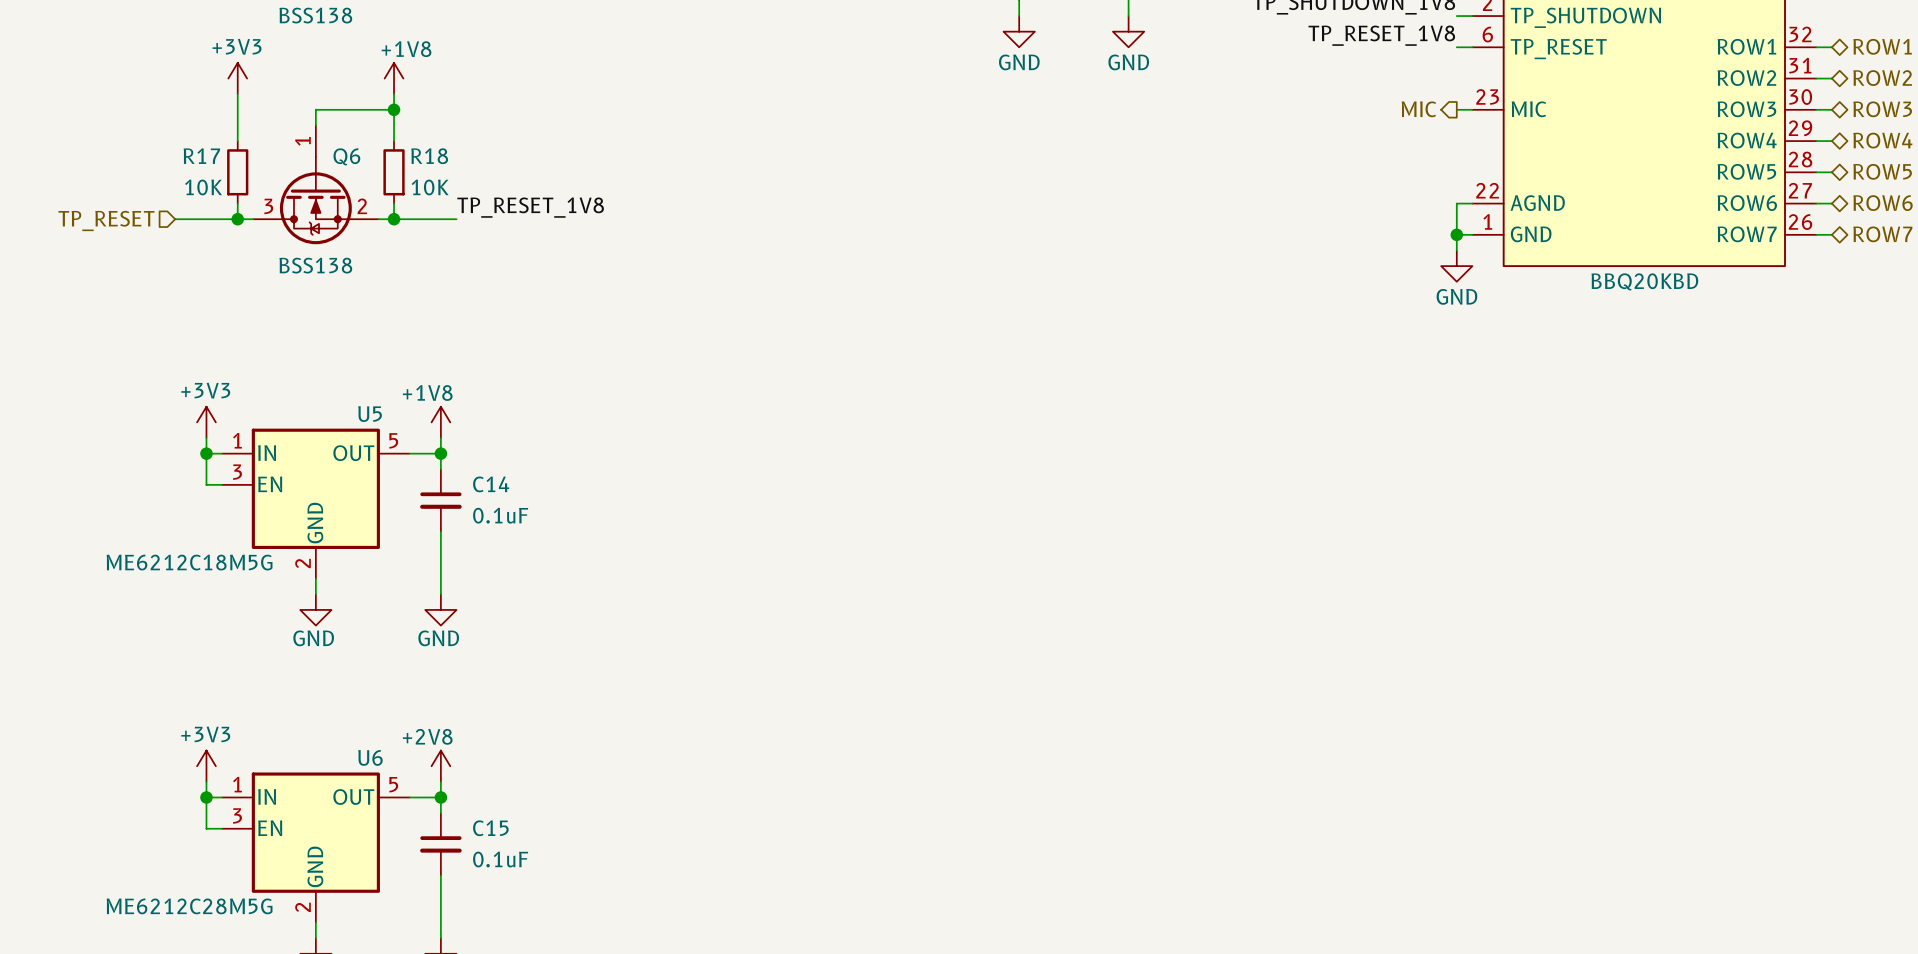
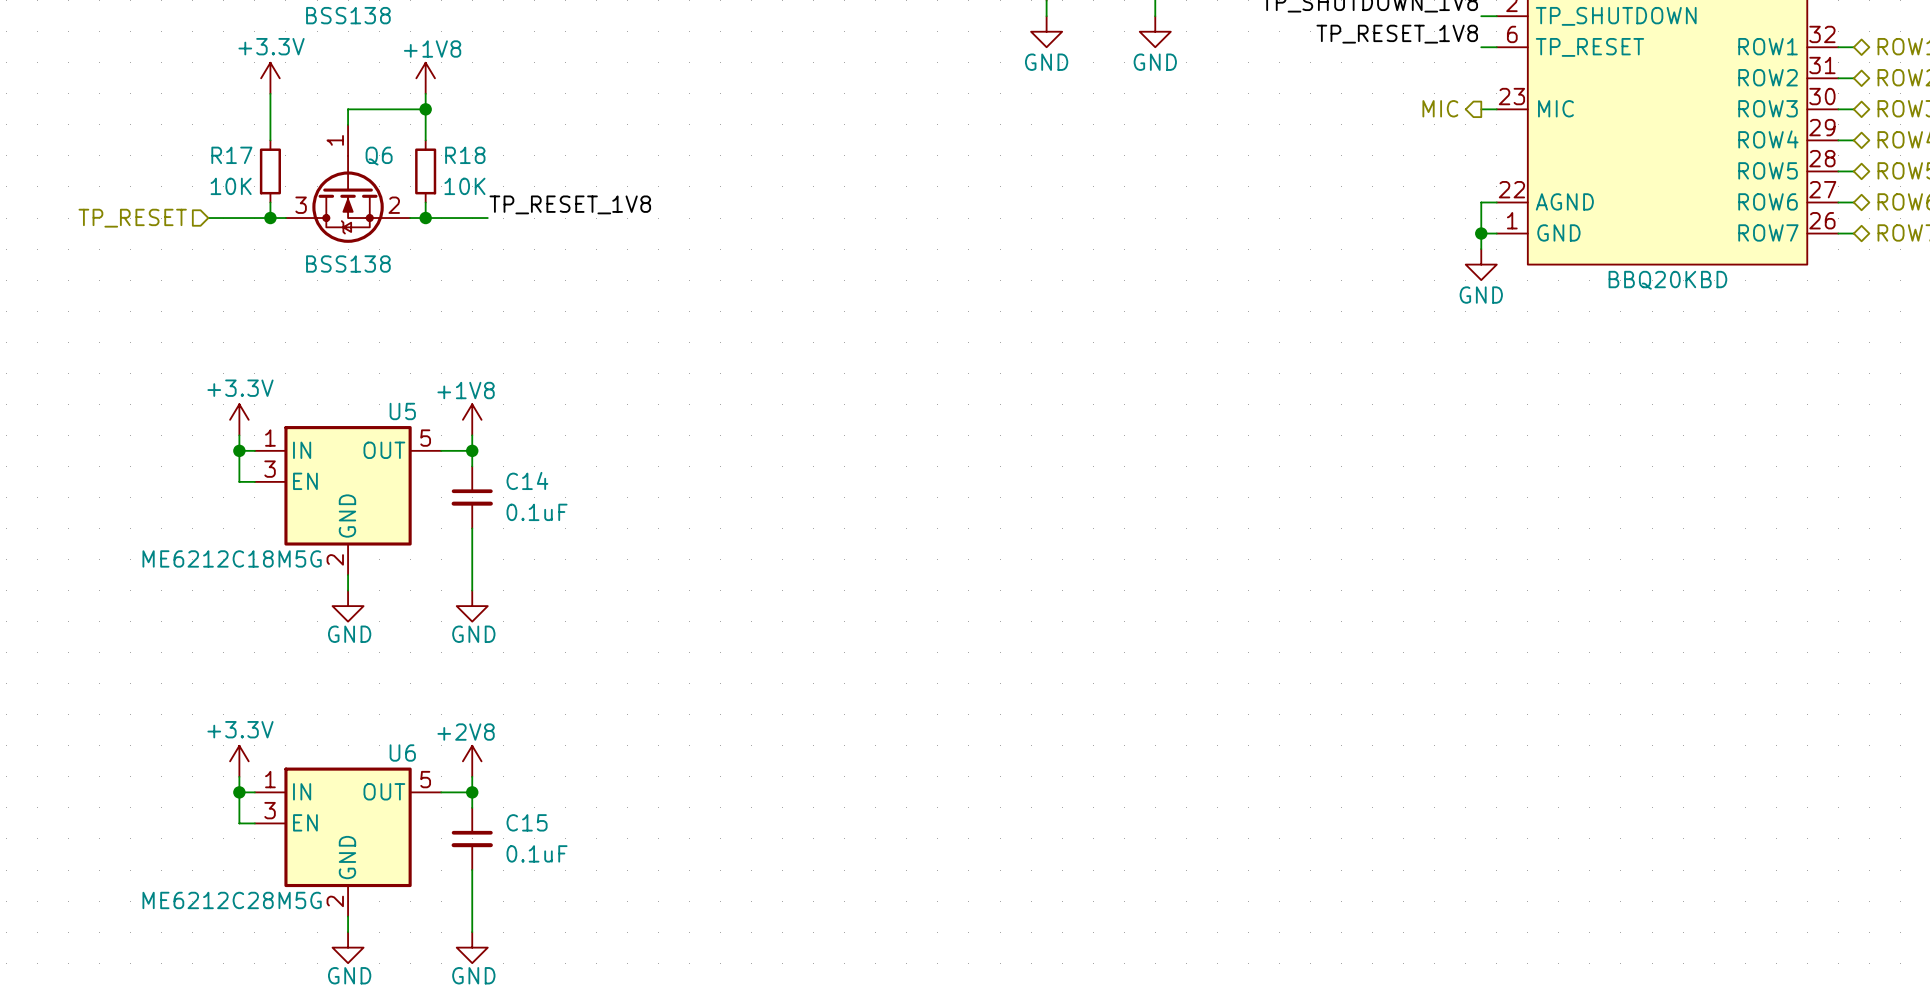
power symbol: +3V3 (237, 78) -> +3.3V (270, 78)
power symbol: +3V3 (206, 422) -> +3.3V (239, 419)
power symbol: +3V3 (206, 766) -> +3.3V (239, 761)

